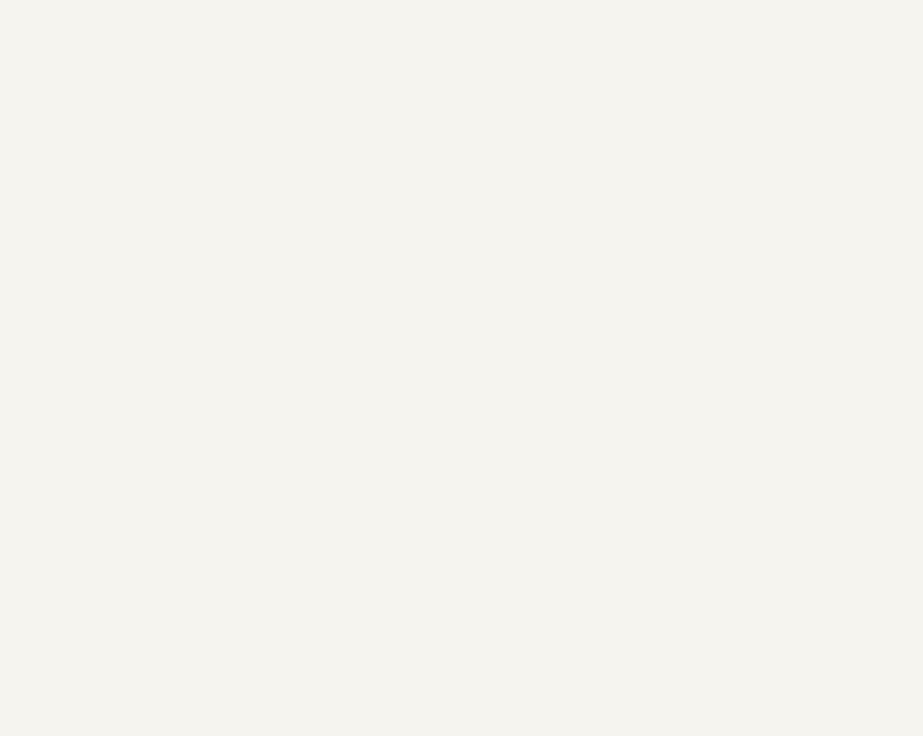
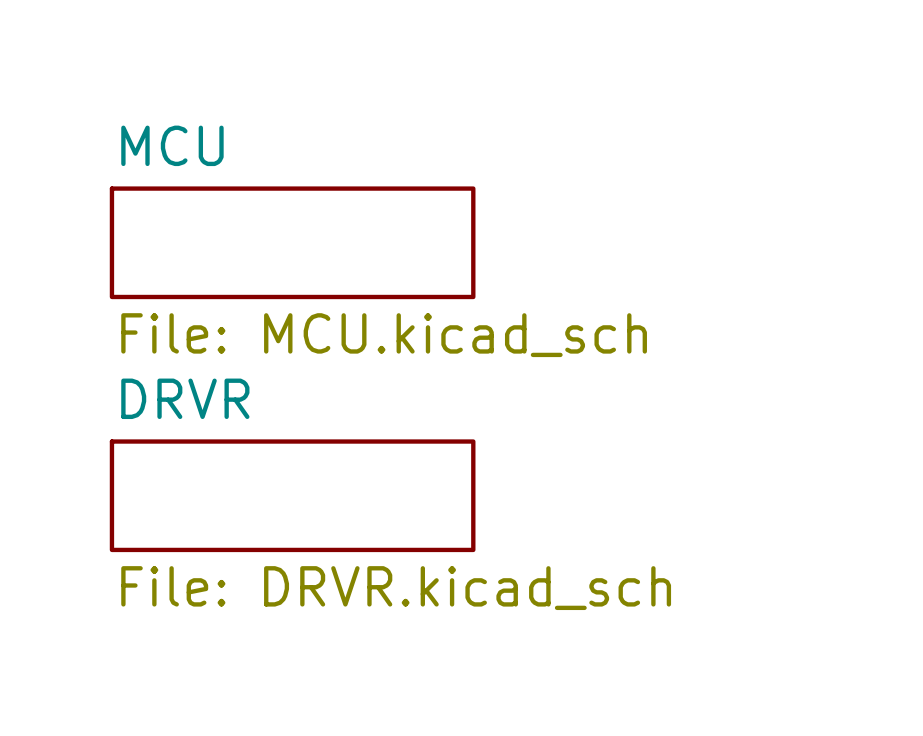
sheet MCU: none -> File: MCU.kicad_sch (292, 242)
sheet DRVR: none -> File: DRVR.kicad_sch (292, 495)

